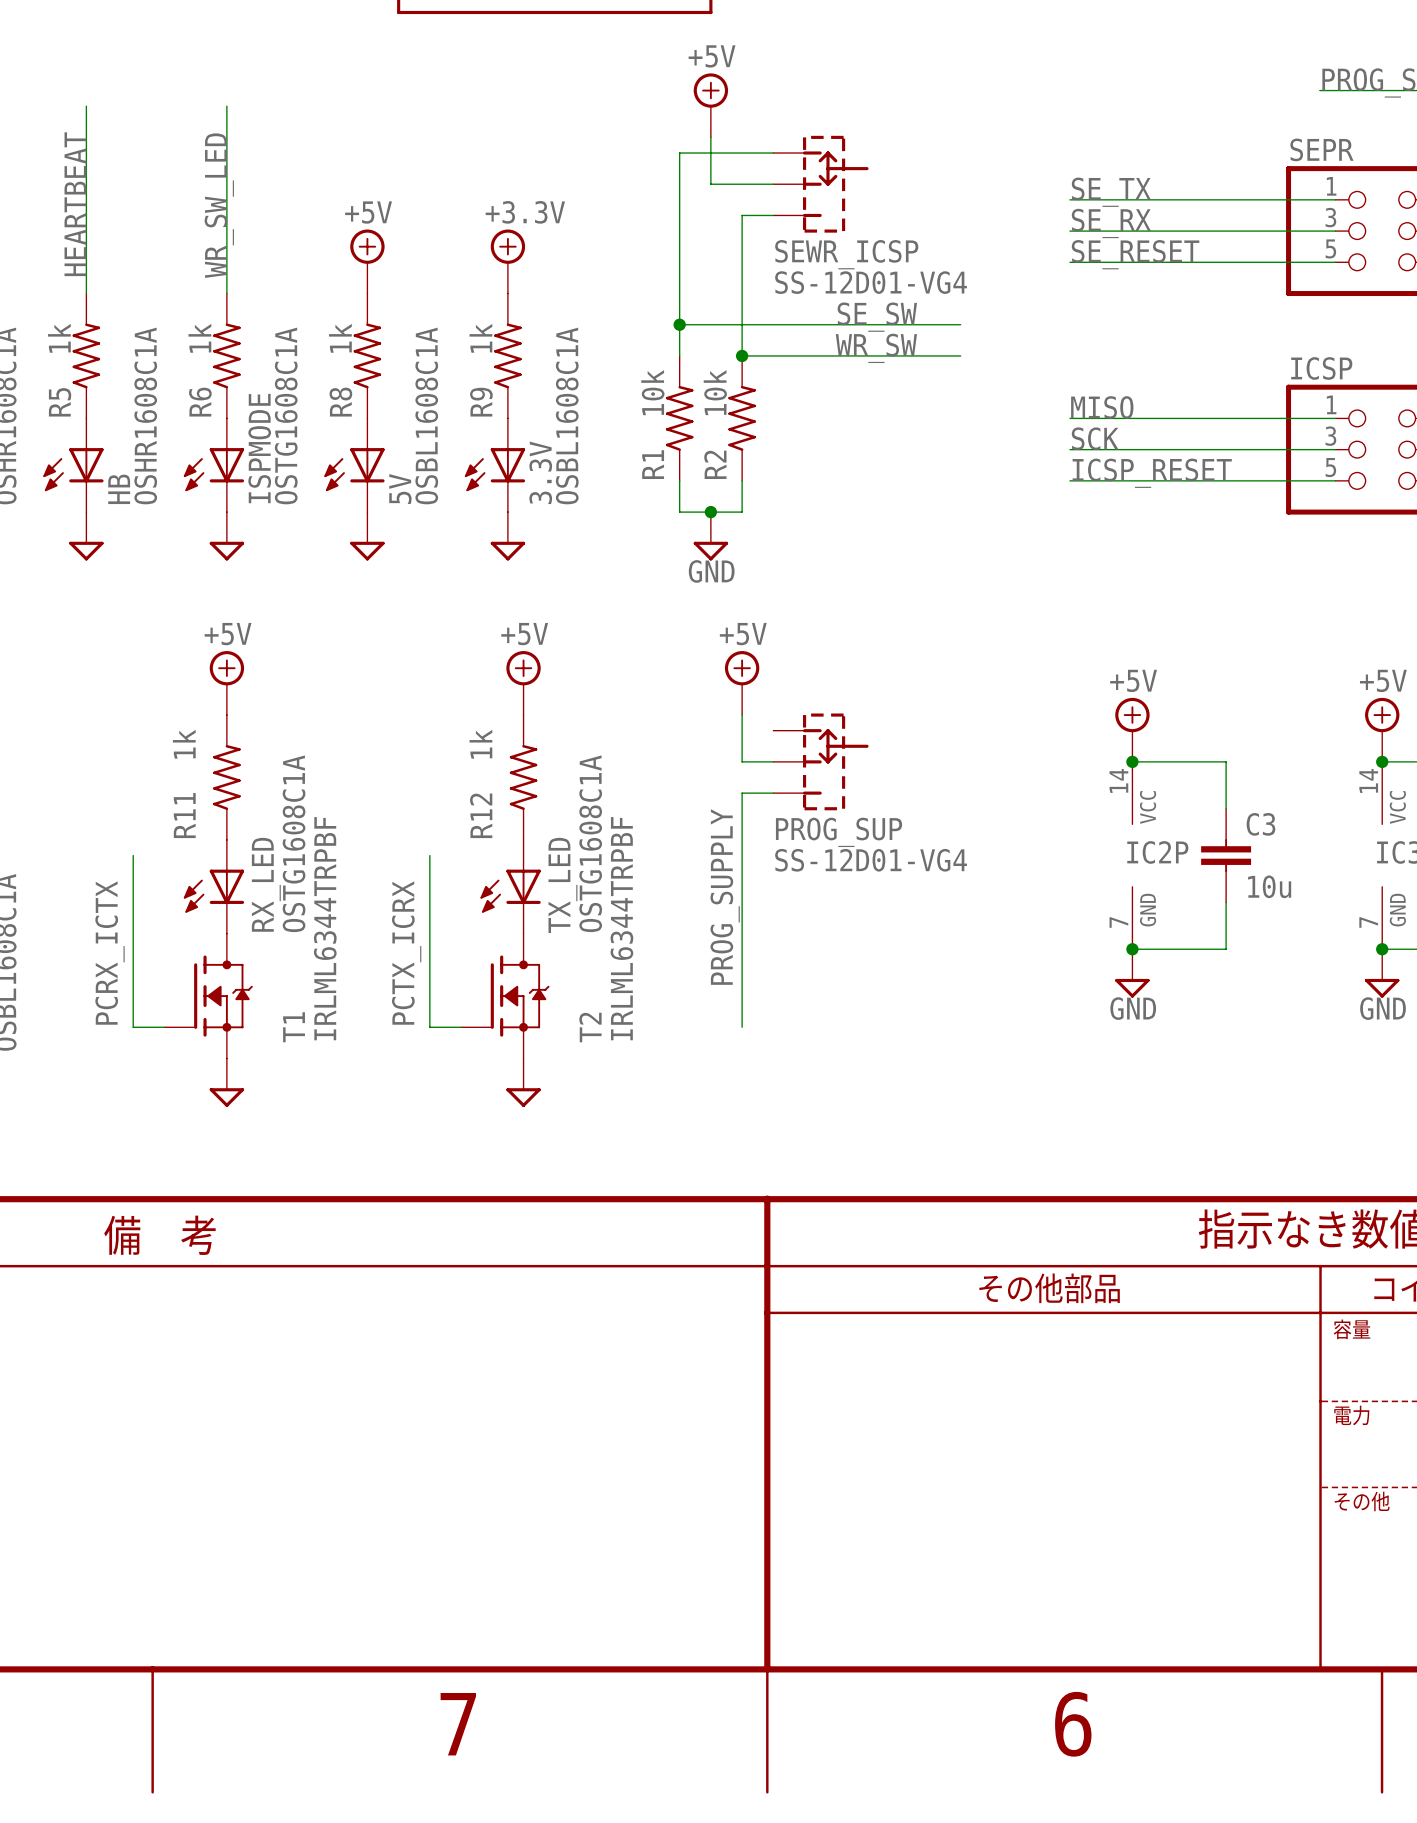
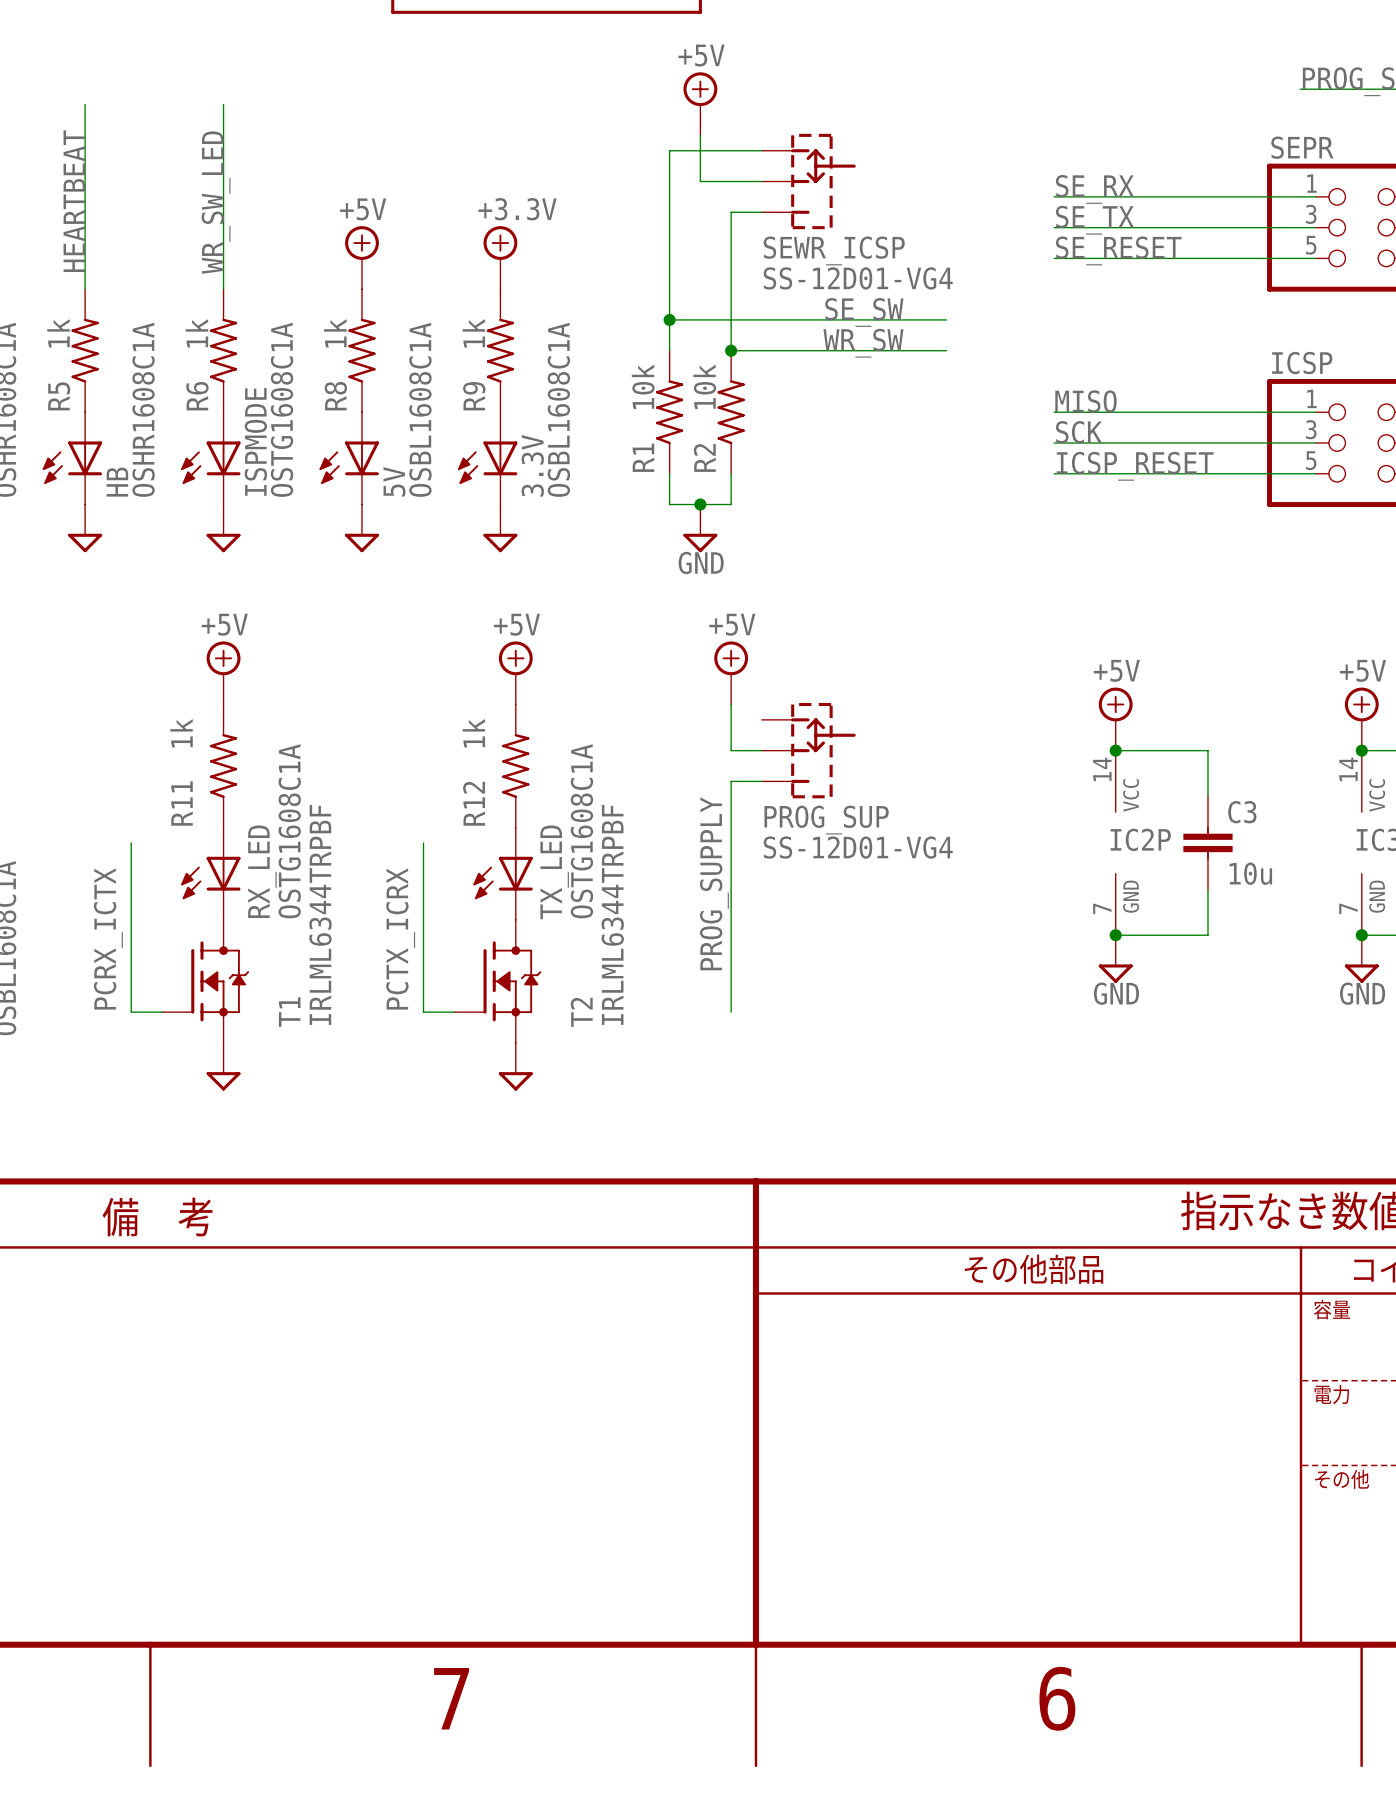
label: SE_TX (1111, 192) -> SE_RX (1094, 189)
label: SE_RX (1111, 223) -> SE_TX (1094, 220)

